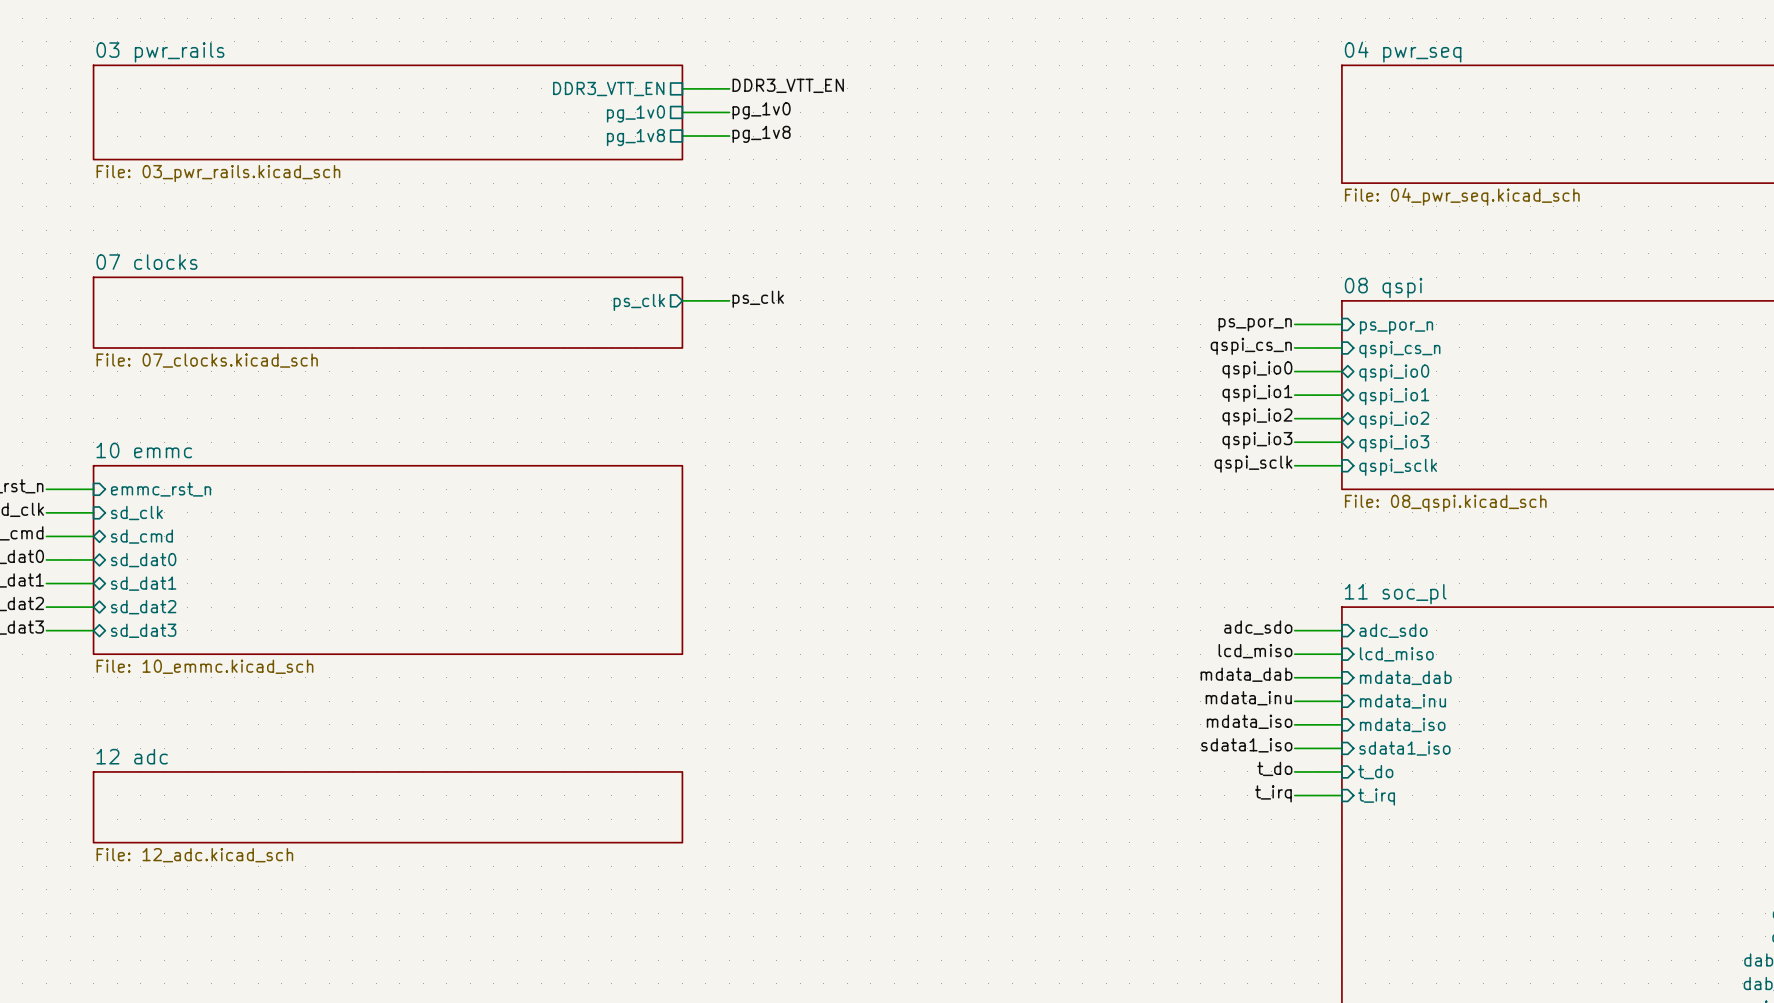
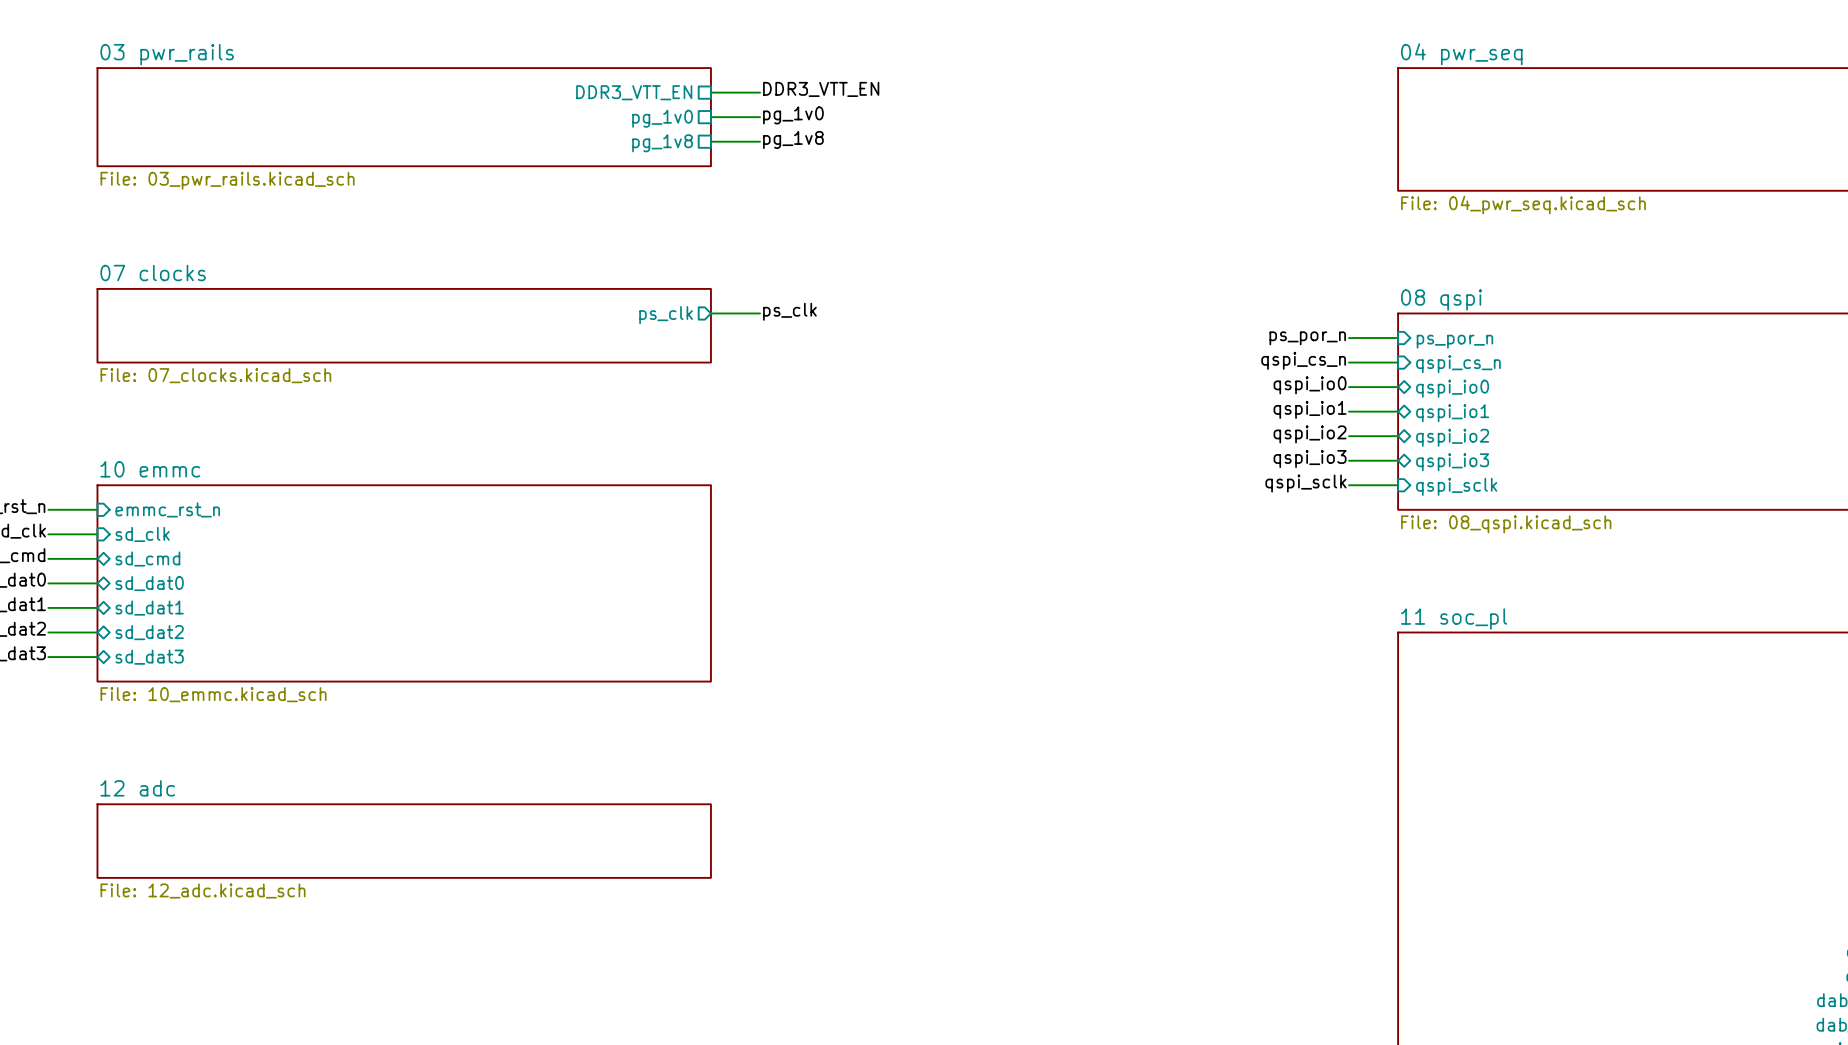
label: adc_sdo (1258, 627) -> none
wire: (1294, 630) (1341, 630) -> none
sheet pin: adc_sdo (1393, 630) -> none
label: lcd_miso (1255, 651) -> none
wire: (1294, 654) (1341, 654) -> none
sheet pin: lcd_miso (1396, 654) -> none
label: mdata_dab (1246, 674) -> none
wire: (1294, 677) (1341, 677) -> none
sheet pin: mdata_dab (1405, 677) -> none
label: mdata_inu (1248, 698) -> none
wire: (1294, 701) (1341, 701) -> none
sheet pin: mdata_inu (1402, 701) -> none
label: mdata_iso (1249, 721) -> none
wire: (1294, 724) (1341, 724) -> none
sheet pin: mdata_iso (1402, 724) -> none
label: sdata1_iso (1246, 745) -> none
wire: (1294, 748) (1341, 748) -> none
sheet pin: sdata1_iso (1404, 748) -> none
label: t_do (1274, 768) -> none
wire: (1294, 771) (1341, 771) -> none
sheet pin: t_do (1375, 772) -> none
label: t_irq (1273, 793) -> none
wire: (1294, 795) (1341, 795) -> none
sheet pin: t_irq (1376, 797) -> none

